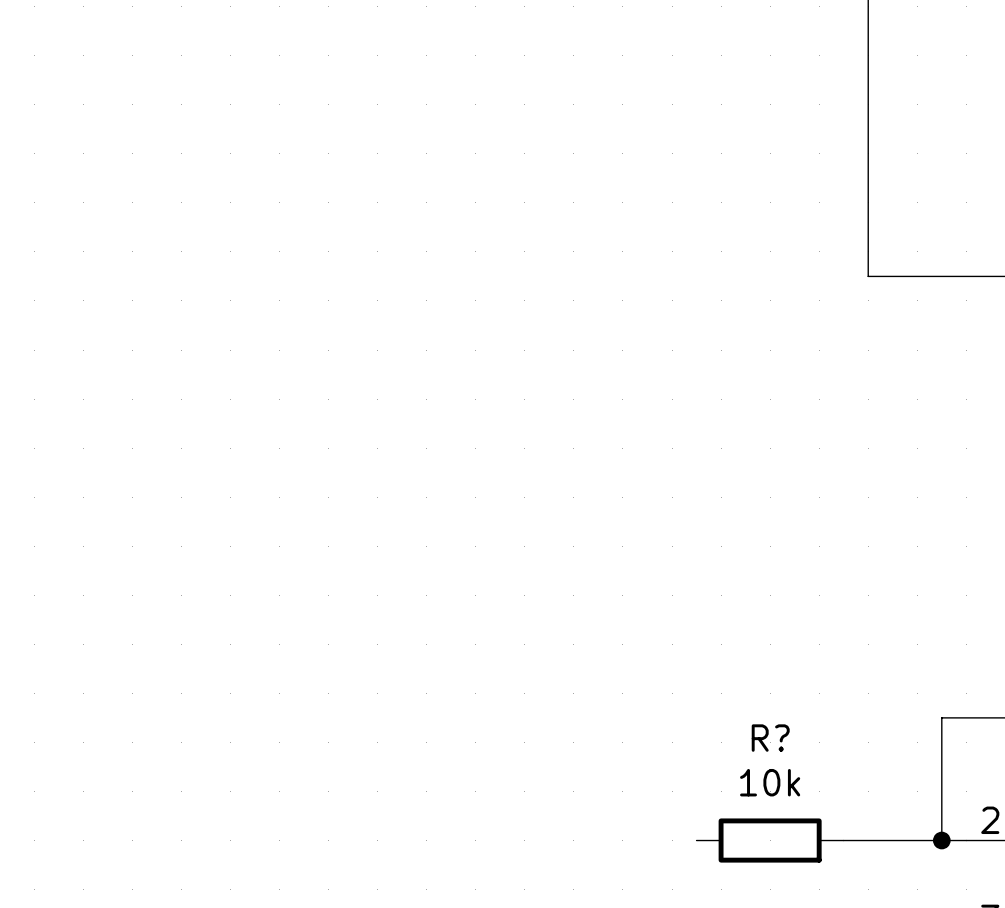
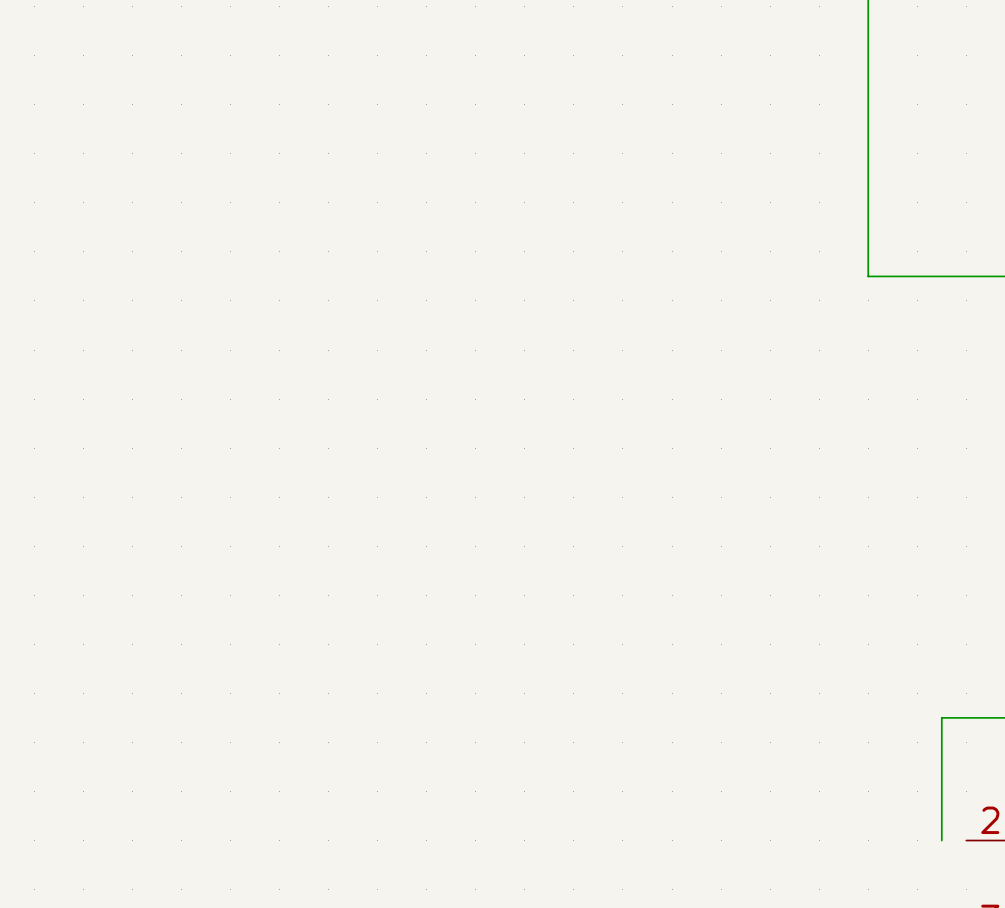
R?: 10k (770, 840) -> none
wire: (843, 840) (966, 840) -> none
junction: (941, 840) -> none

